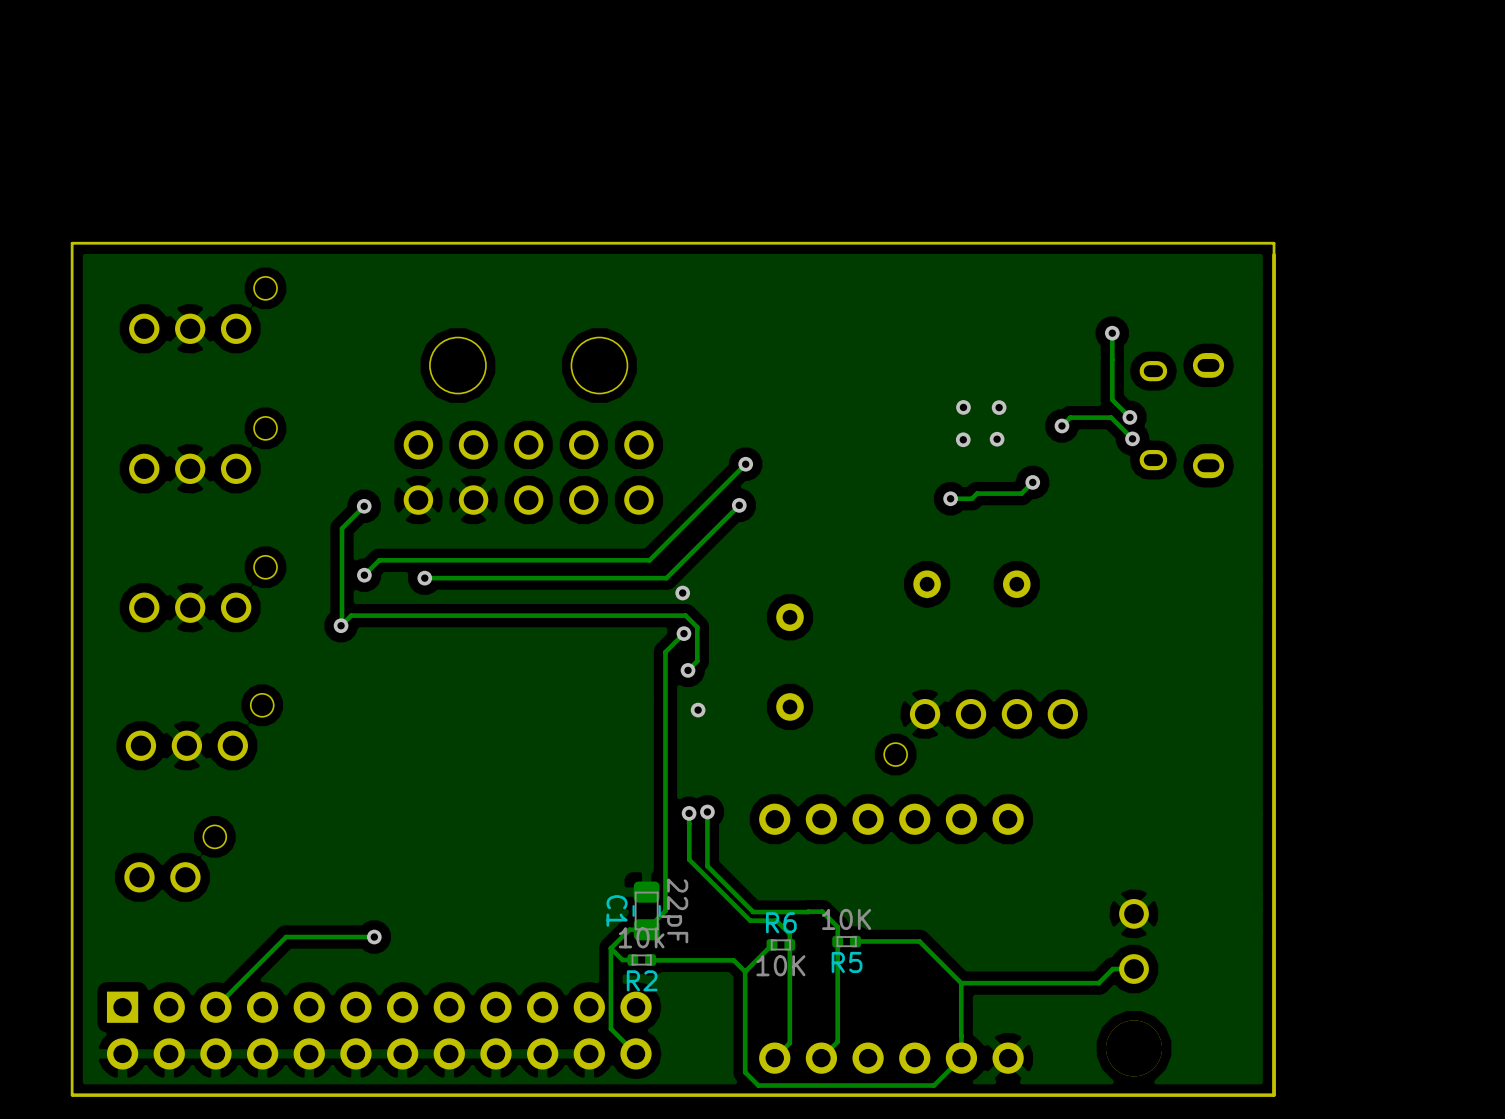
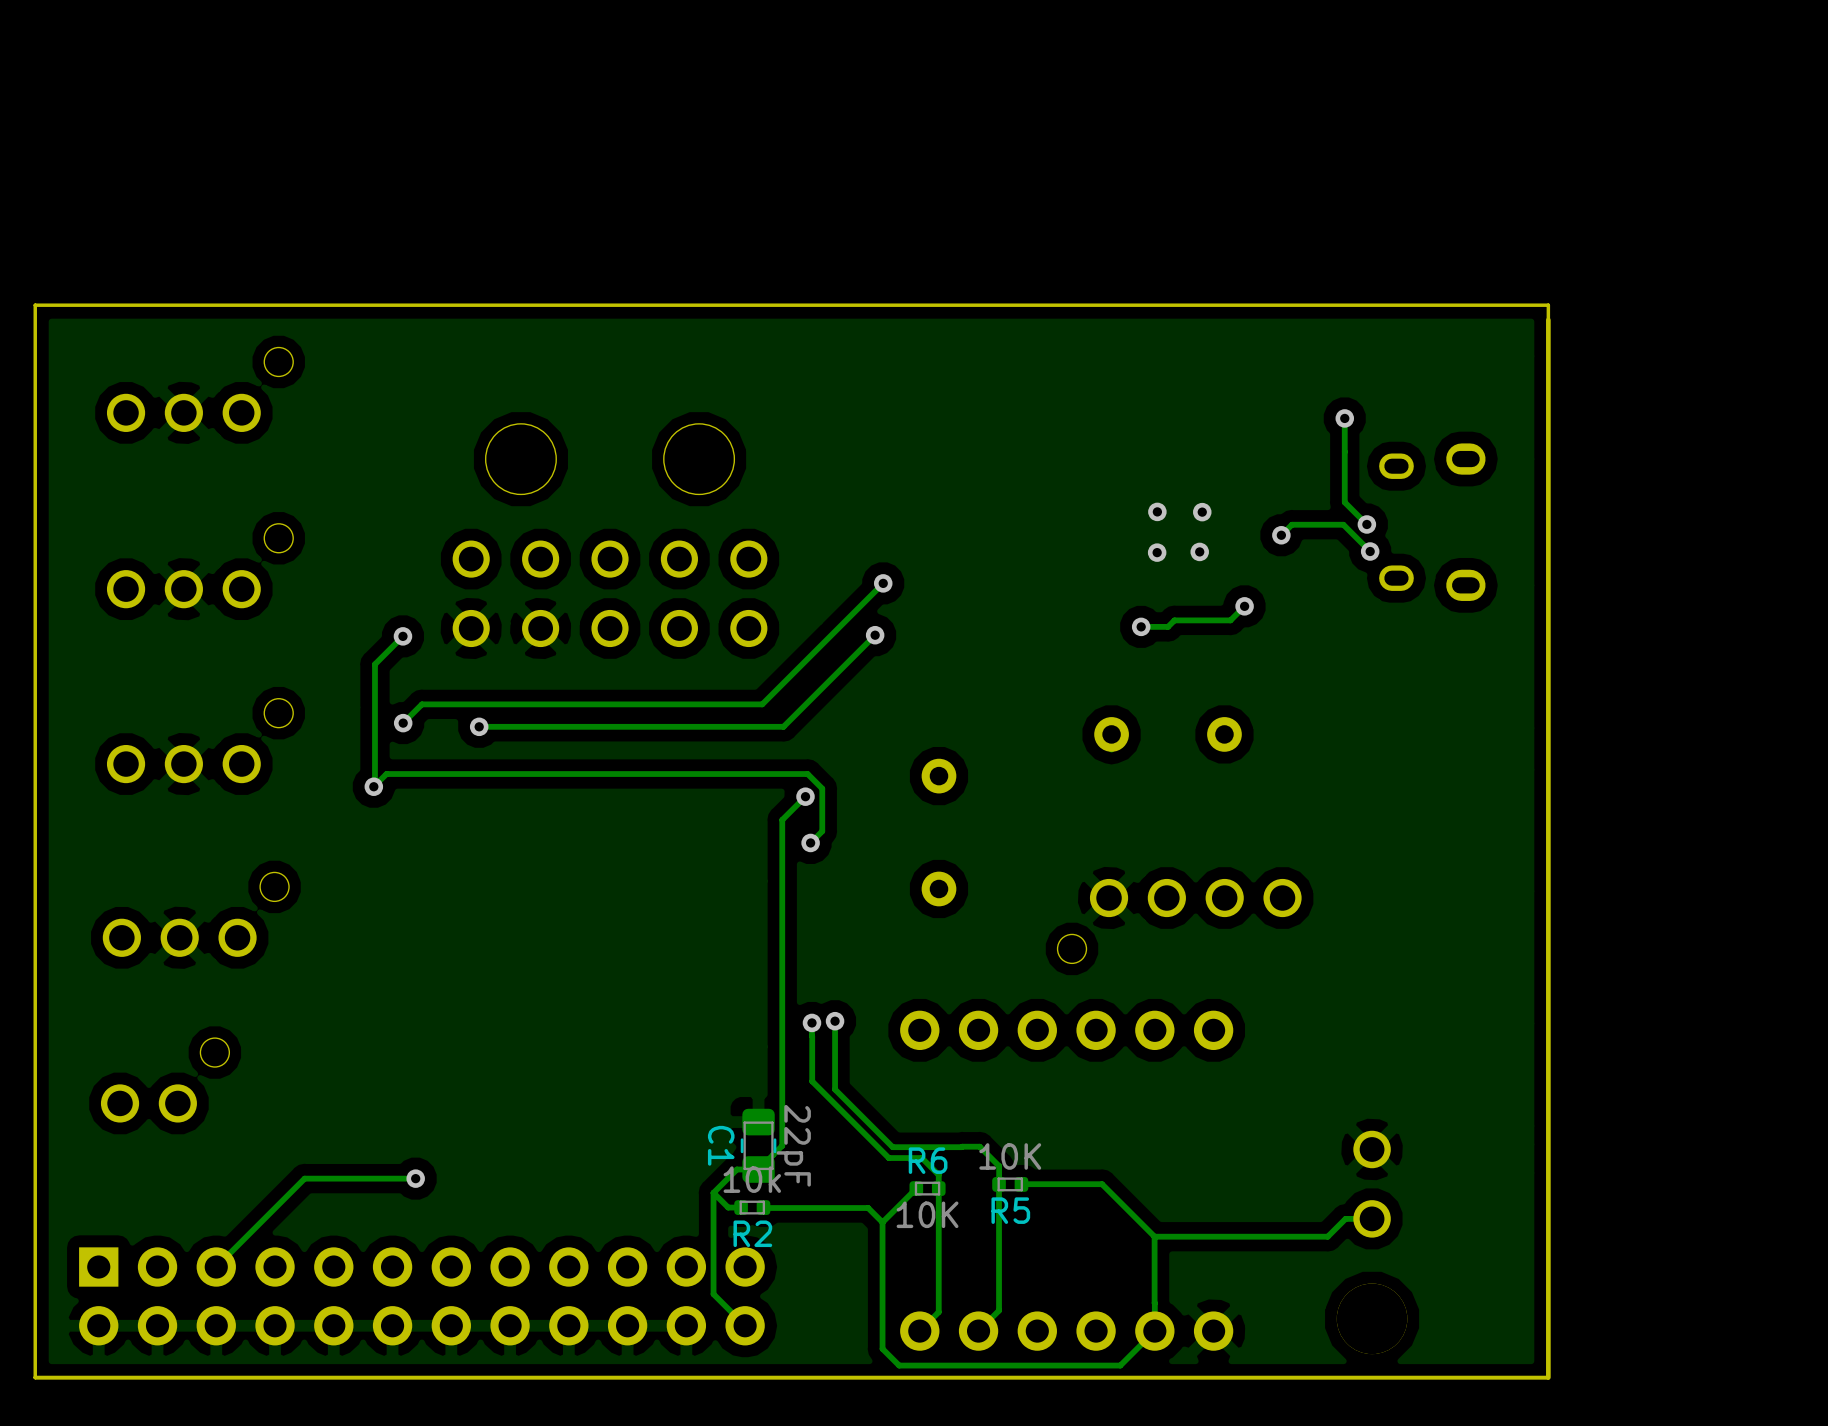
via: (682, 593) -> none
via: (698, 710) -> none

